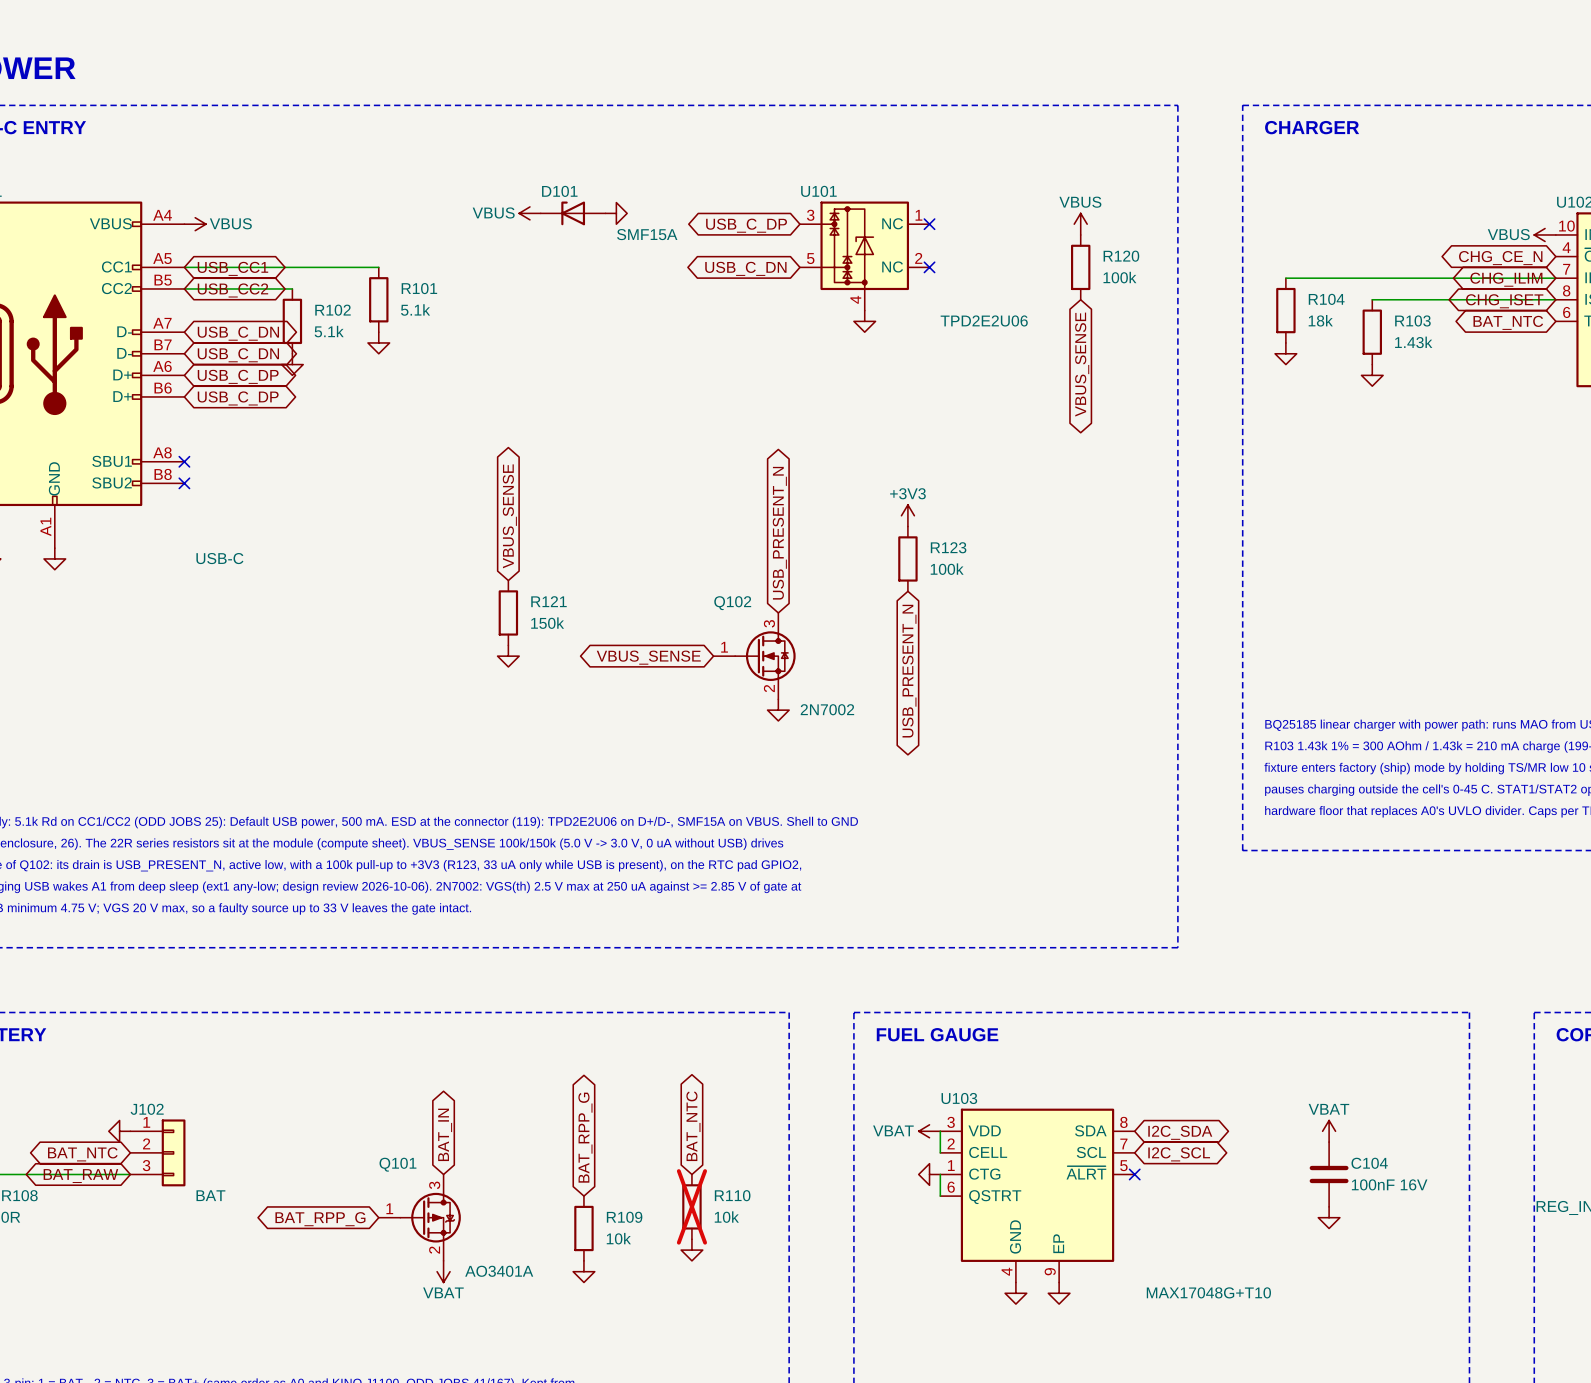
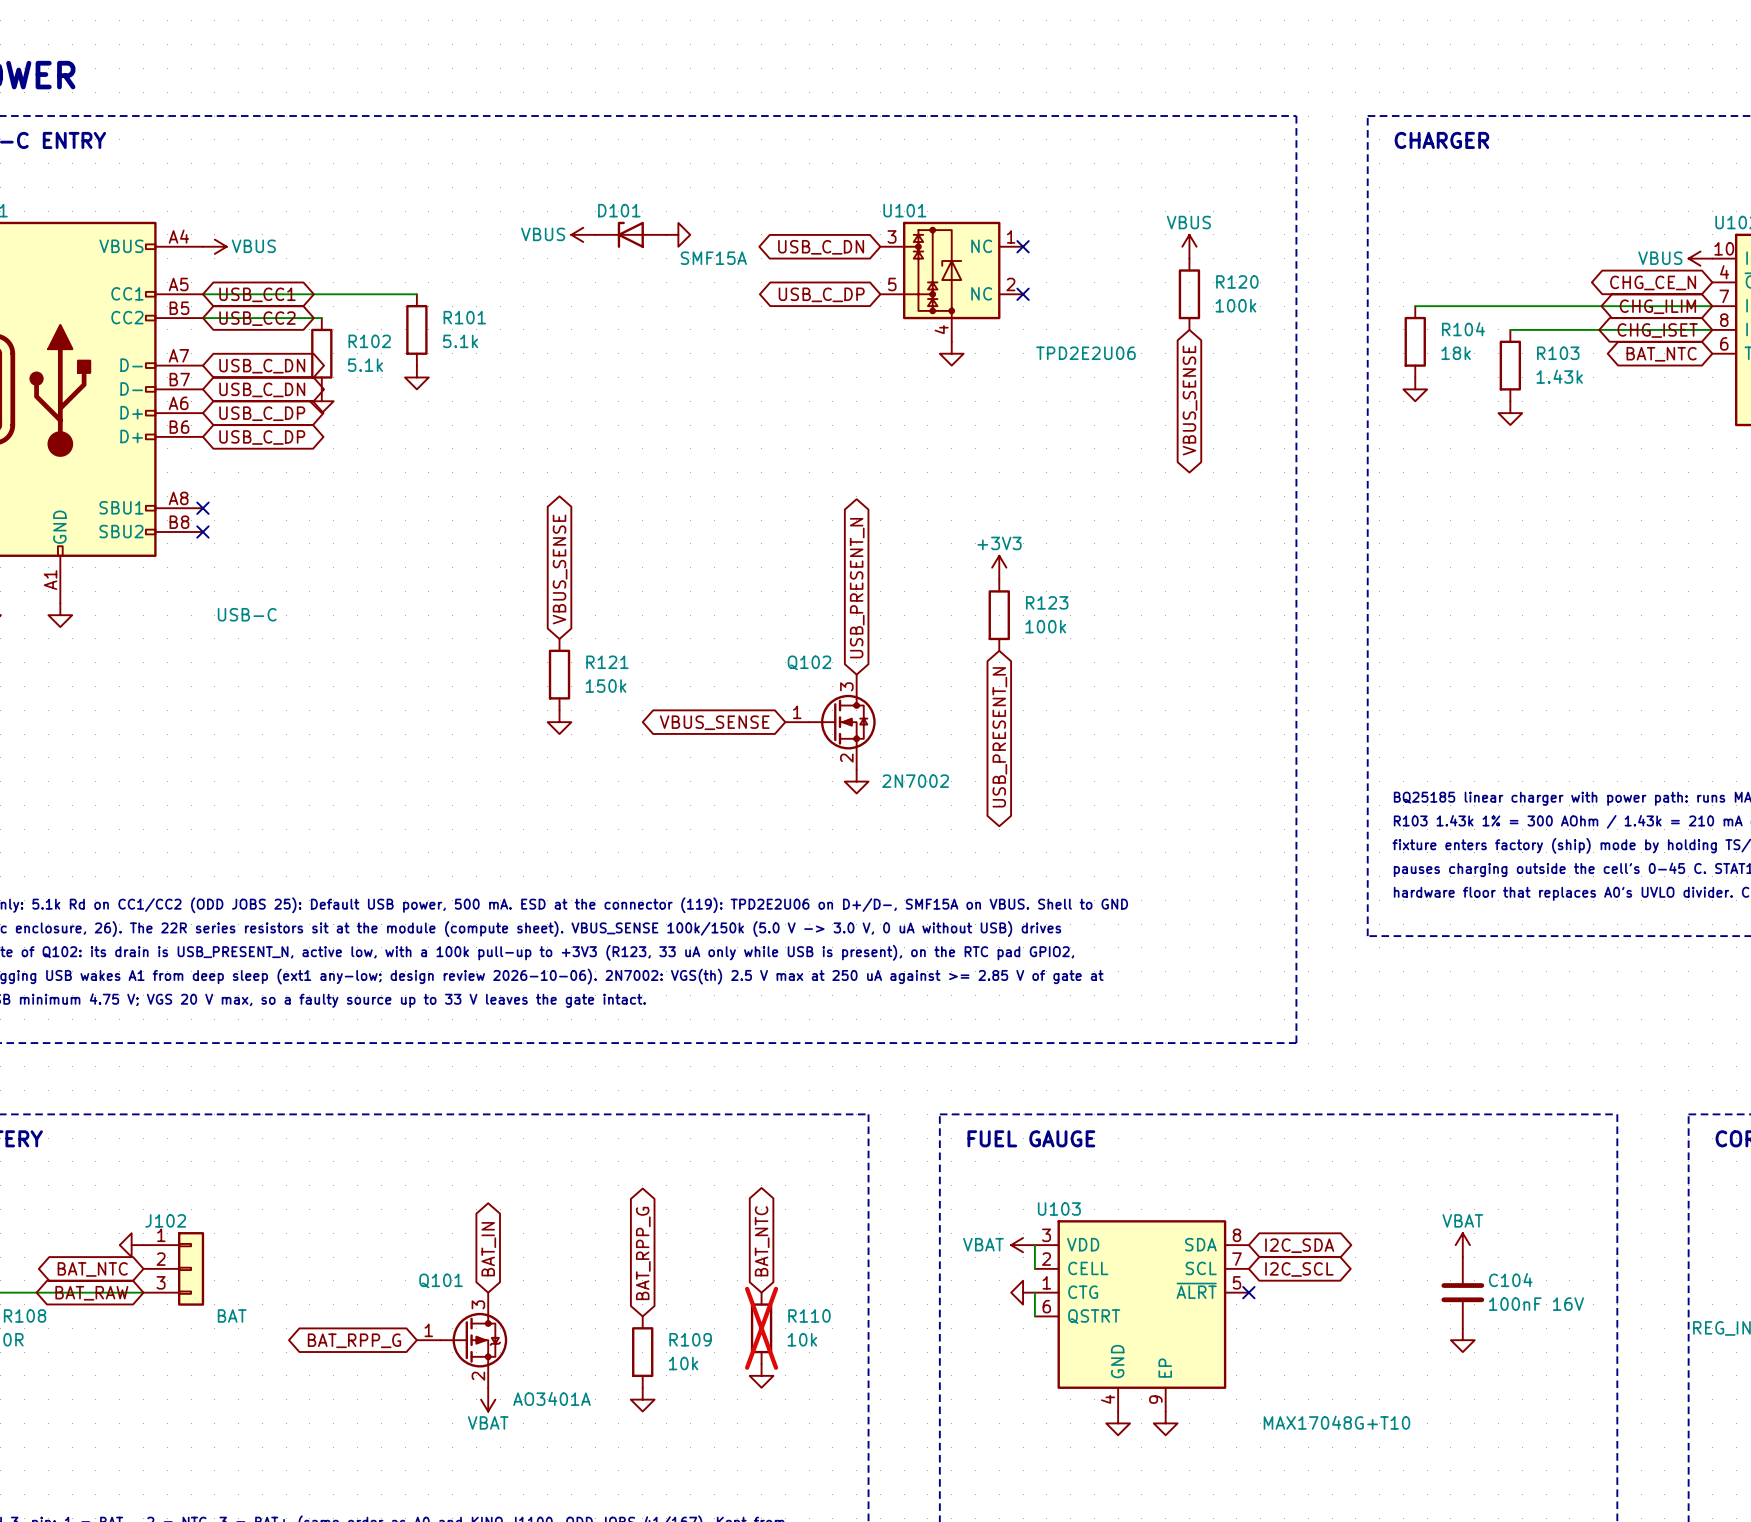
global label: USB_C_DP (746, 225) -> USB_C_DN (821, 247)
global label: USB_C_DN (745, 268) -> USB_C_DP (821, 294)

